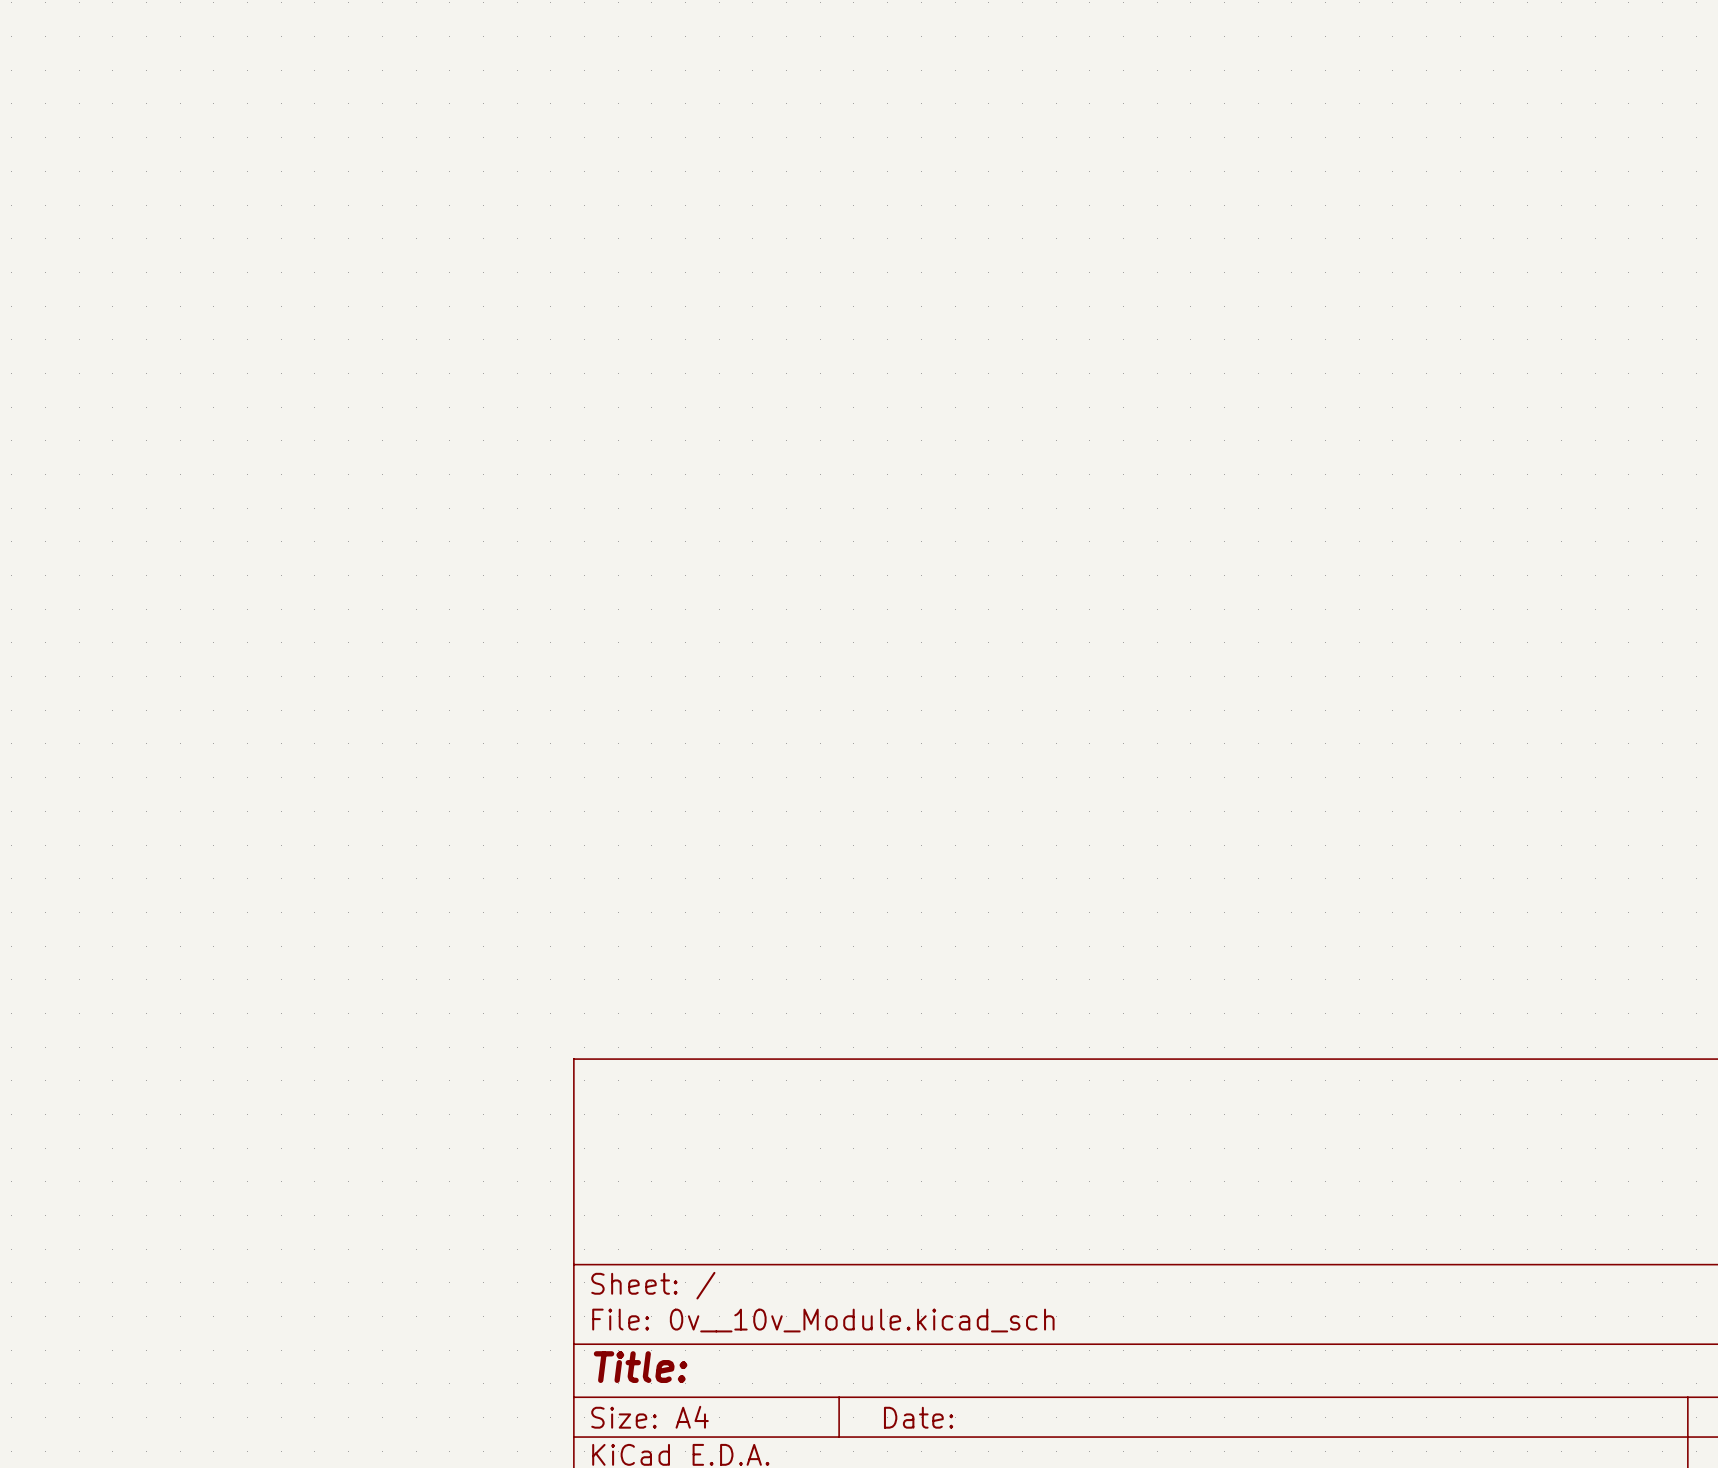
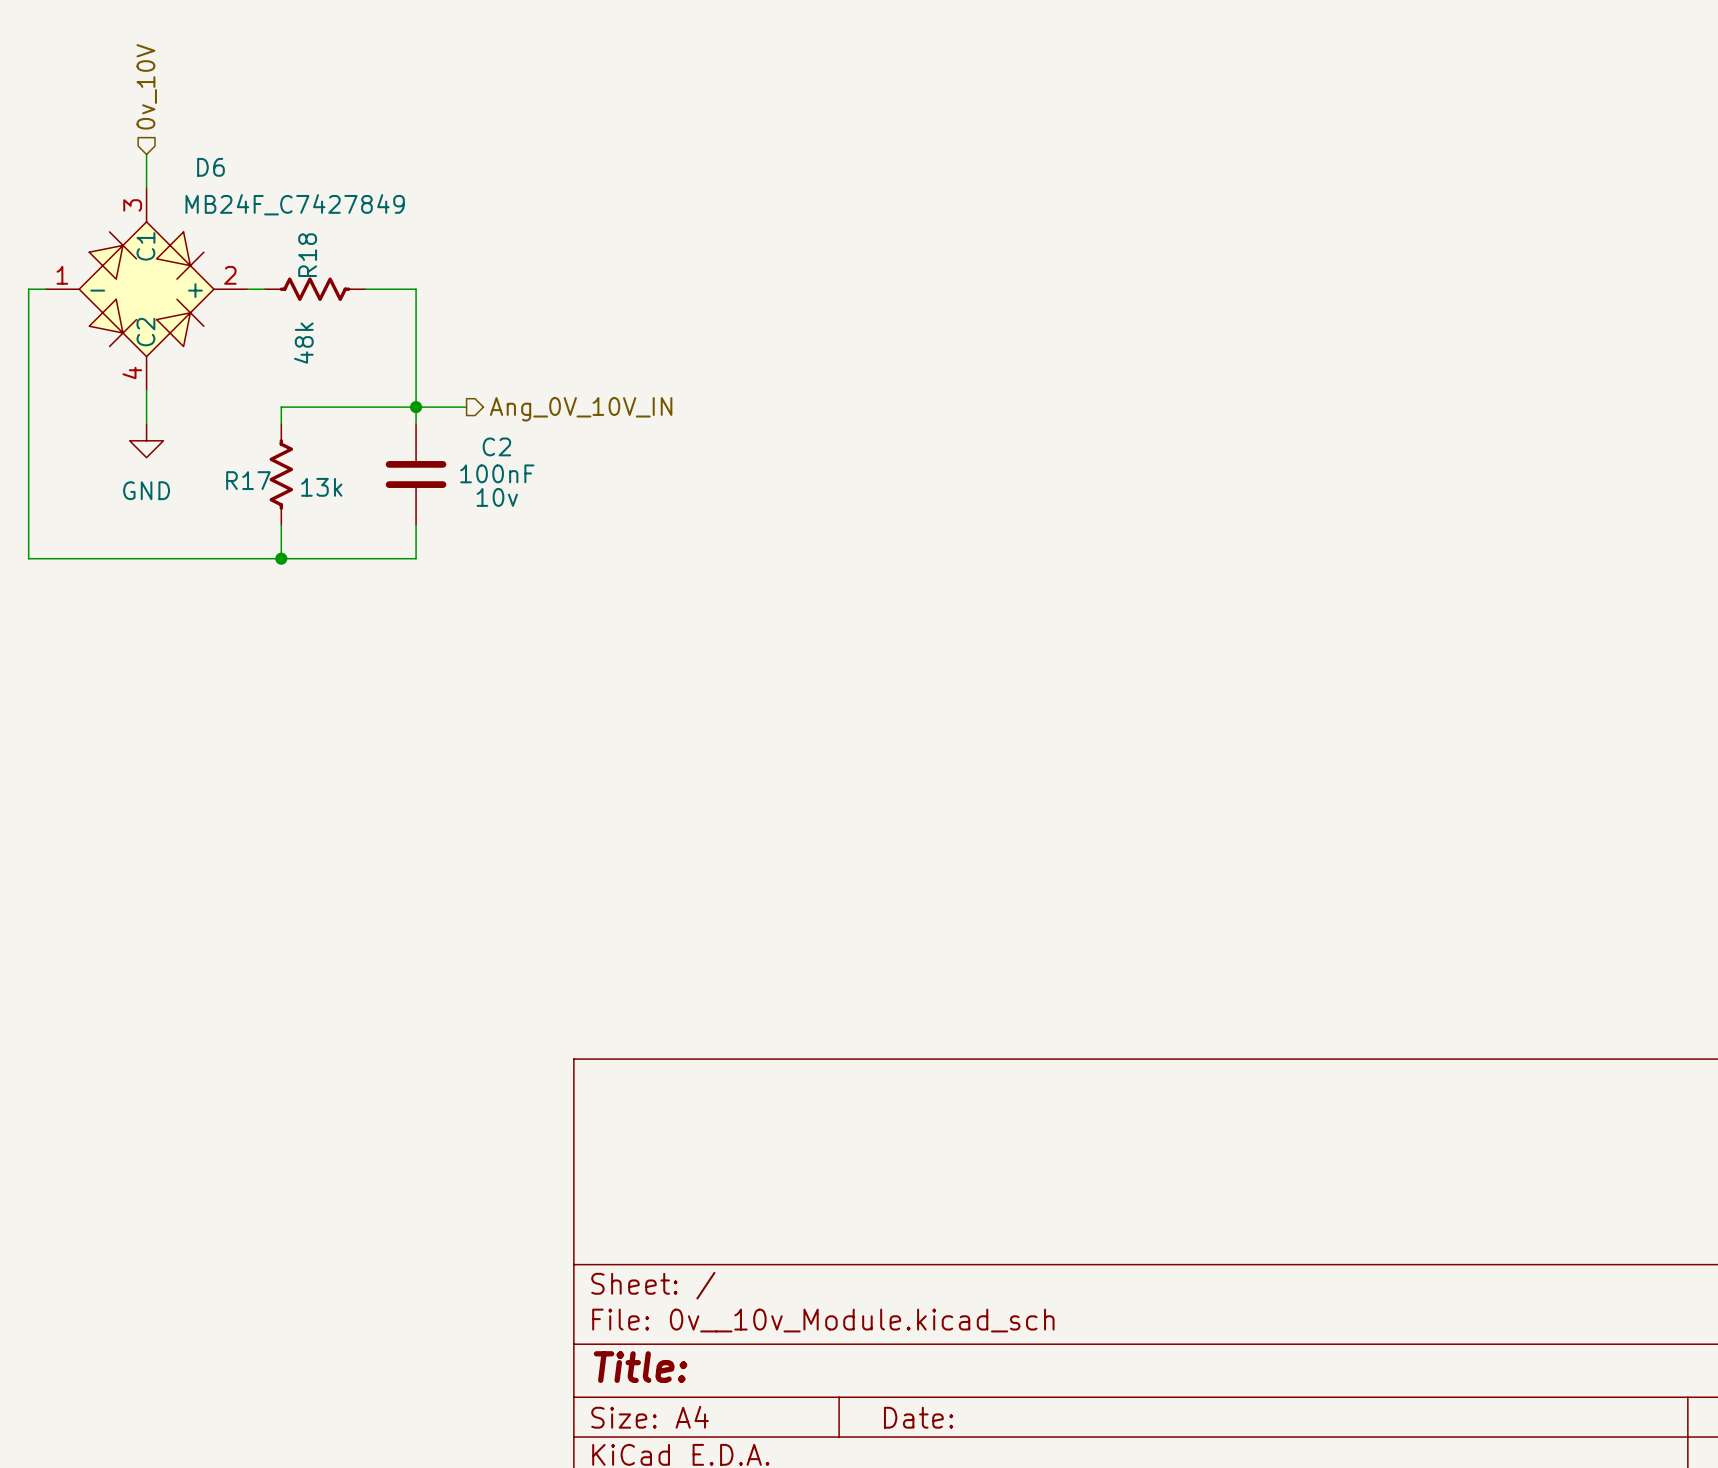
hierarchical label: none -> 0v_10V (146, 86)
wire: none -> (146, 154) (146, 188)
wire: none -> (45, 289) (28, 289) (28, 558) (416, 558) (416, 525)
D6: none -> MB24F_C7427849 (146, 289)
wire: none -> (247, 289) (264, 289)
R18: none -> (314, 289)
wire: none -> (365, 289) (416, 289) (416, 423)
wire: none -> (146, 390) (146, 423)
junction: none -> (416, 407)
wire: none -> (466, 407) (281, 407) (281, 423)
hierarchical label: none -> Ang_0V_10V_IN (581, 409)
power symbol: none -> GND (146, 440)
R17: none -> (281, 474)
C2: none -> (416, 474)
wire: none -> (281, 525) (281, 558)
junction: none -> (281, 558)

